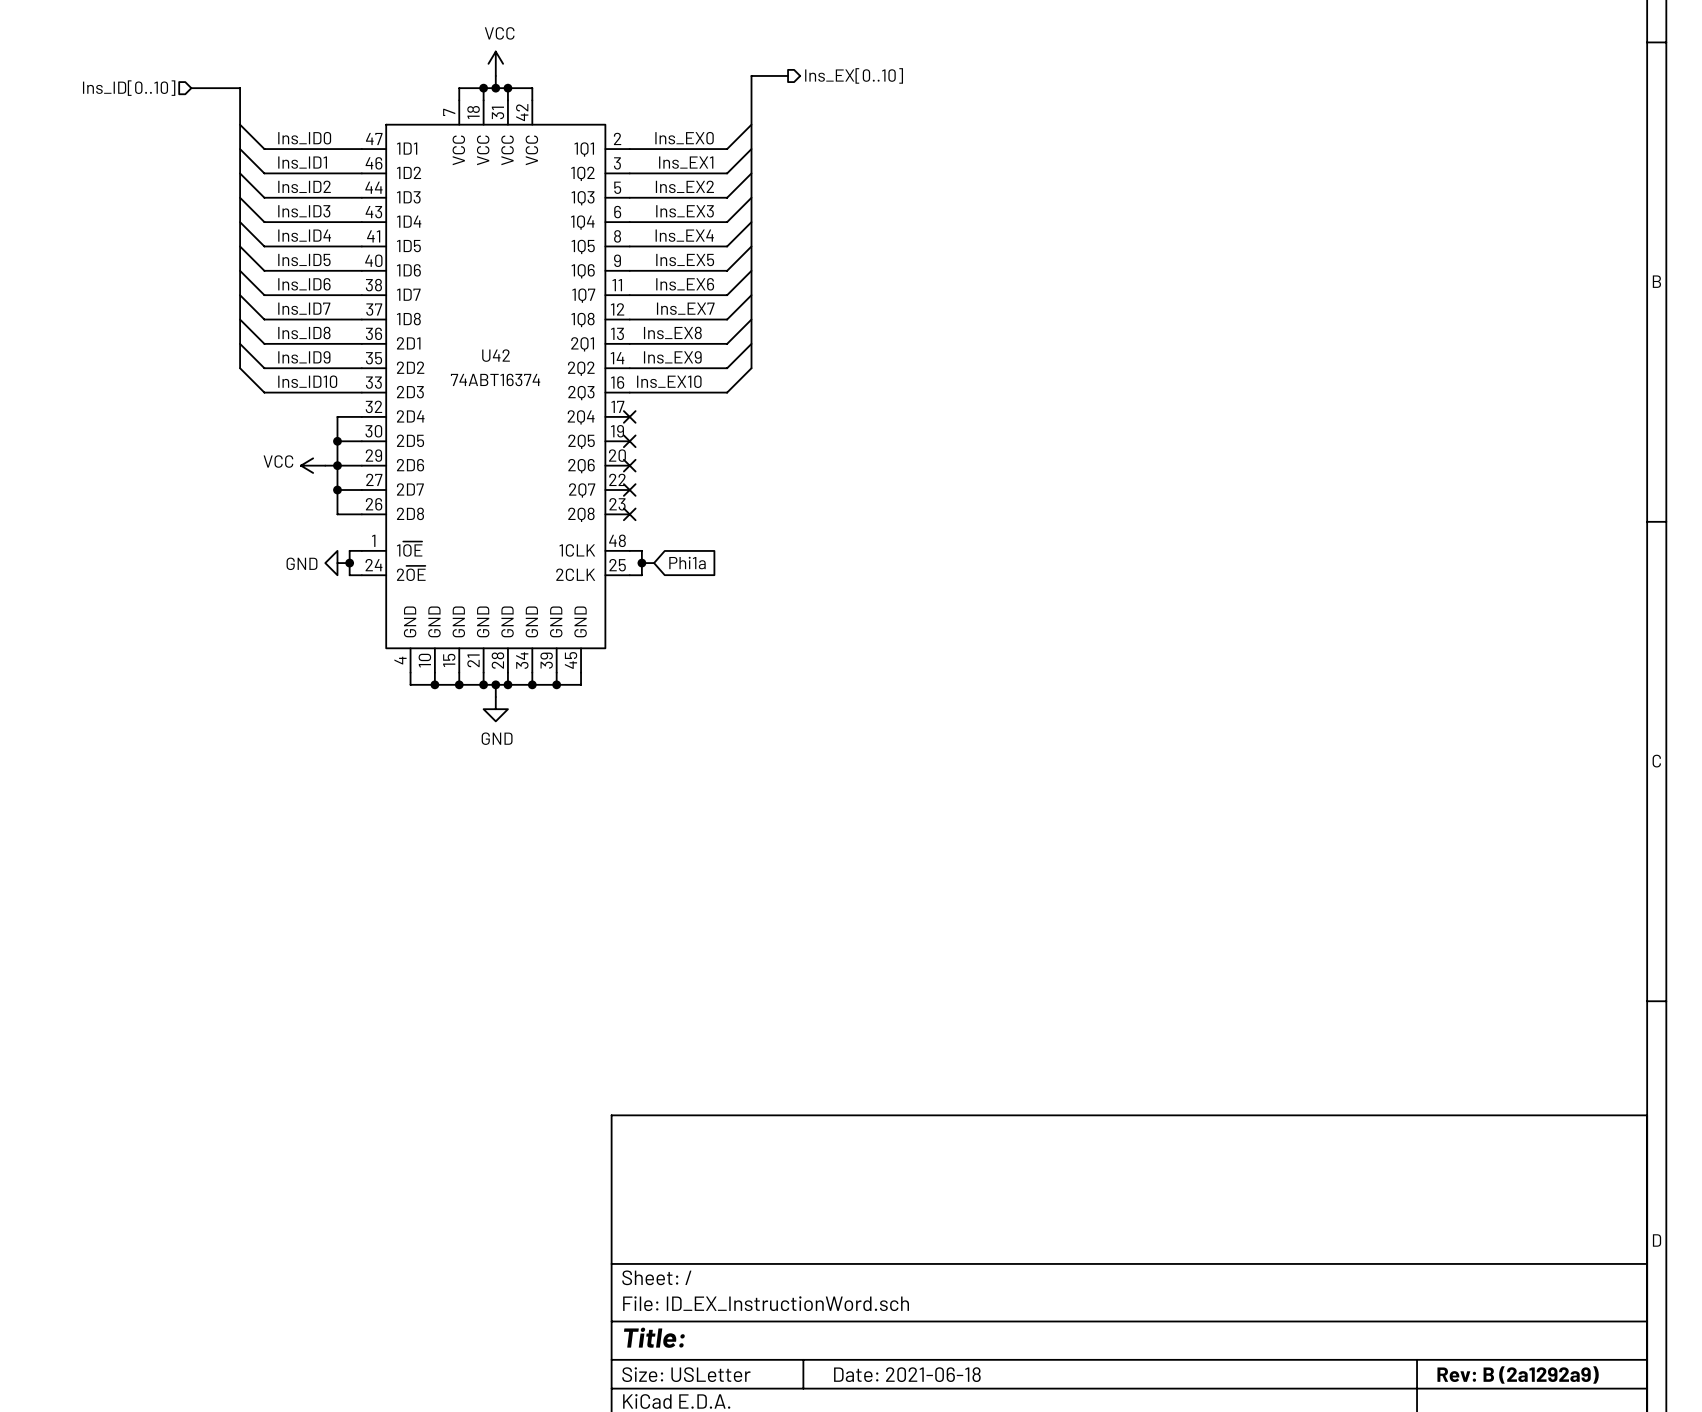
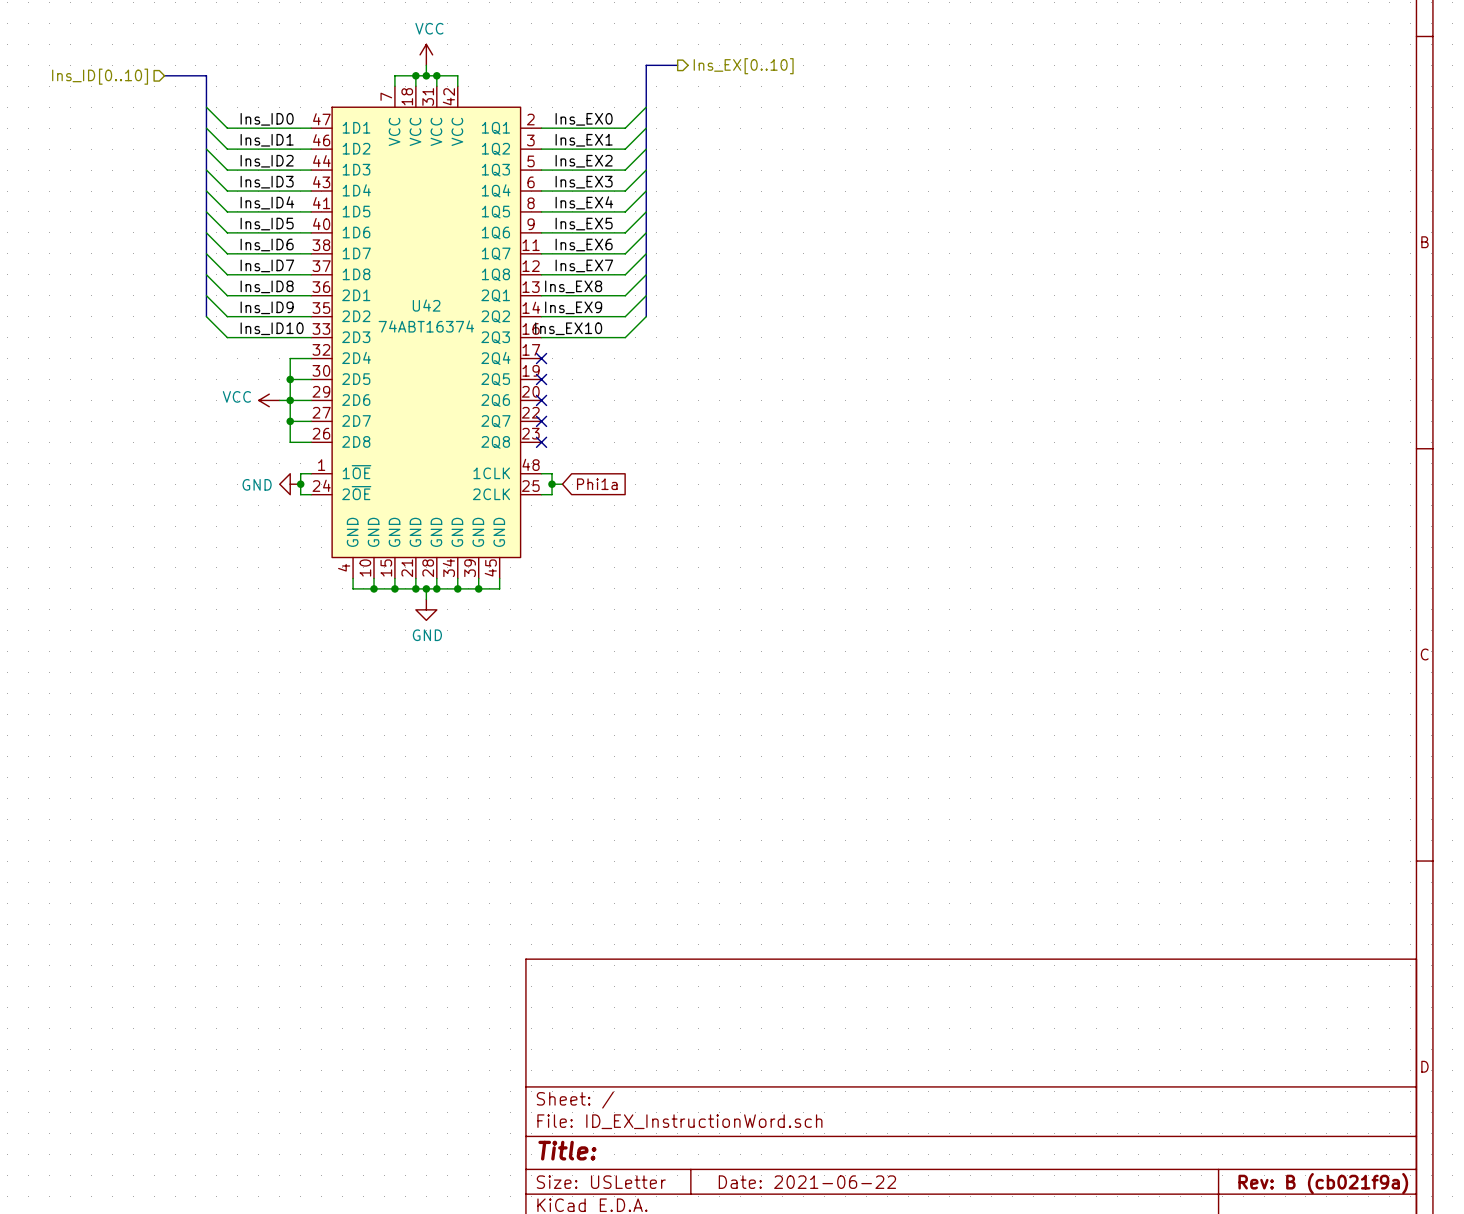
title block: Date: 2021-06-18 (907, 1374) -> Date: 2021-06-22 (807, 1182)
title block: Rev: B (2a1292a9) (1518, 1374) -> Rev: B (cb021f9a) (1323, 1183)

